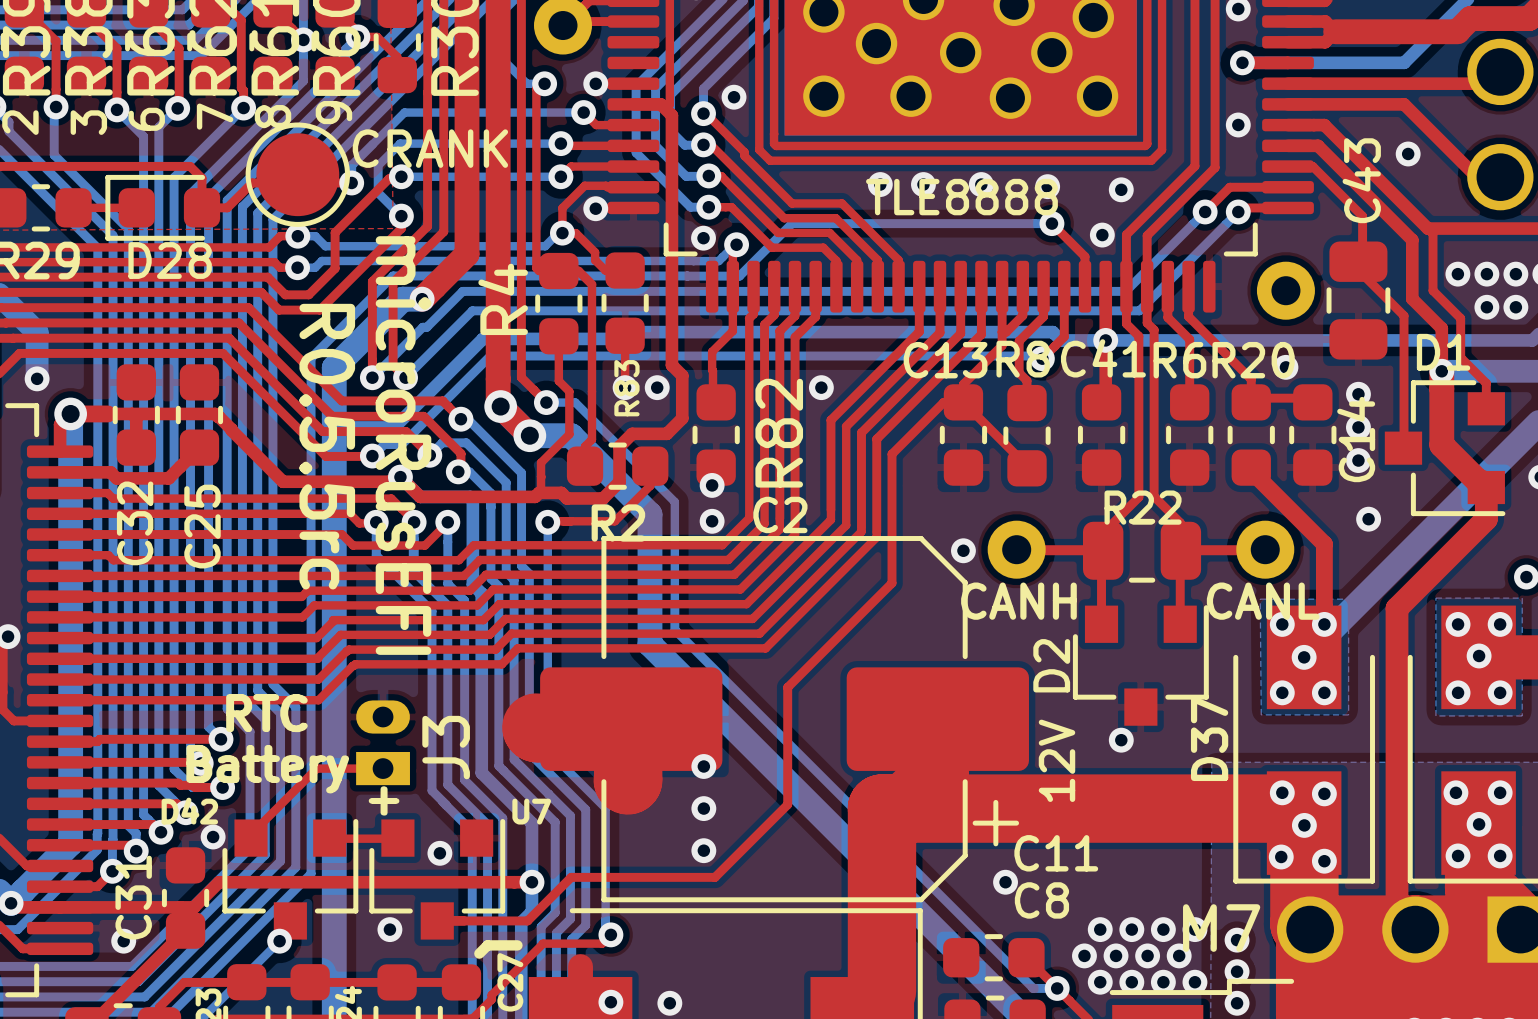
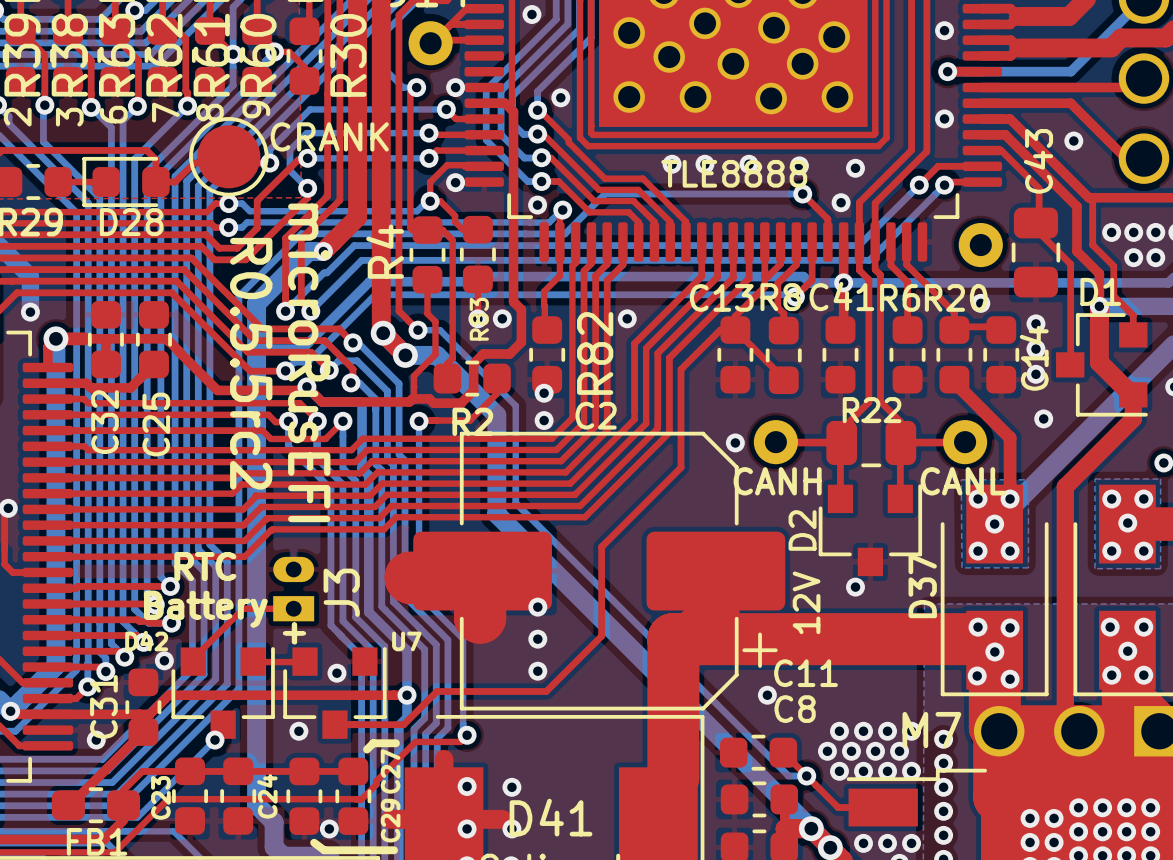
text: R0.5.5rc (327, 446) -> R0.5.5rc2 (251, 363)

